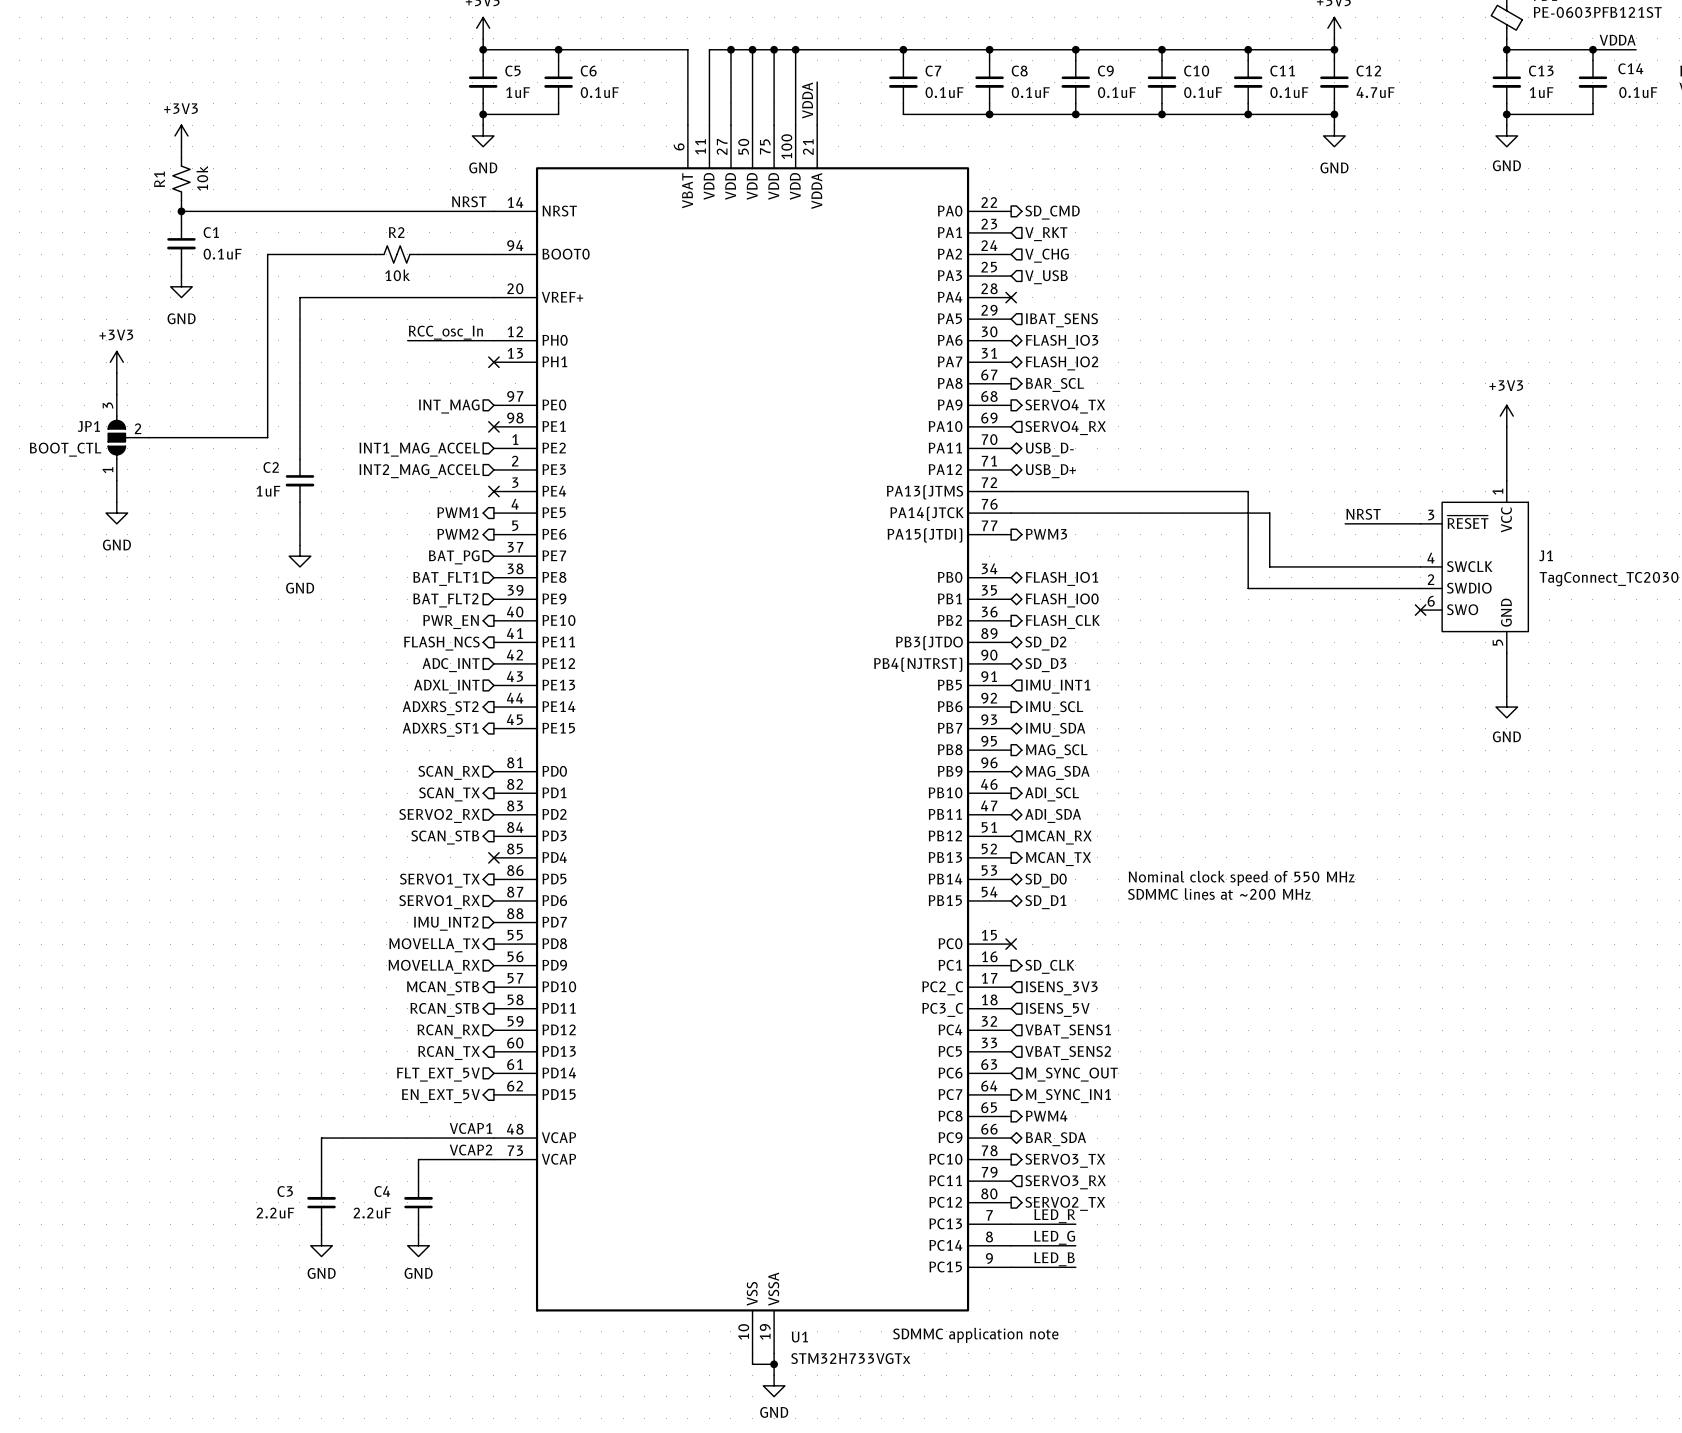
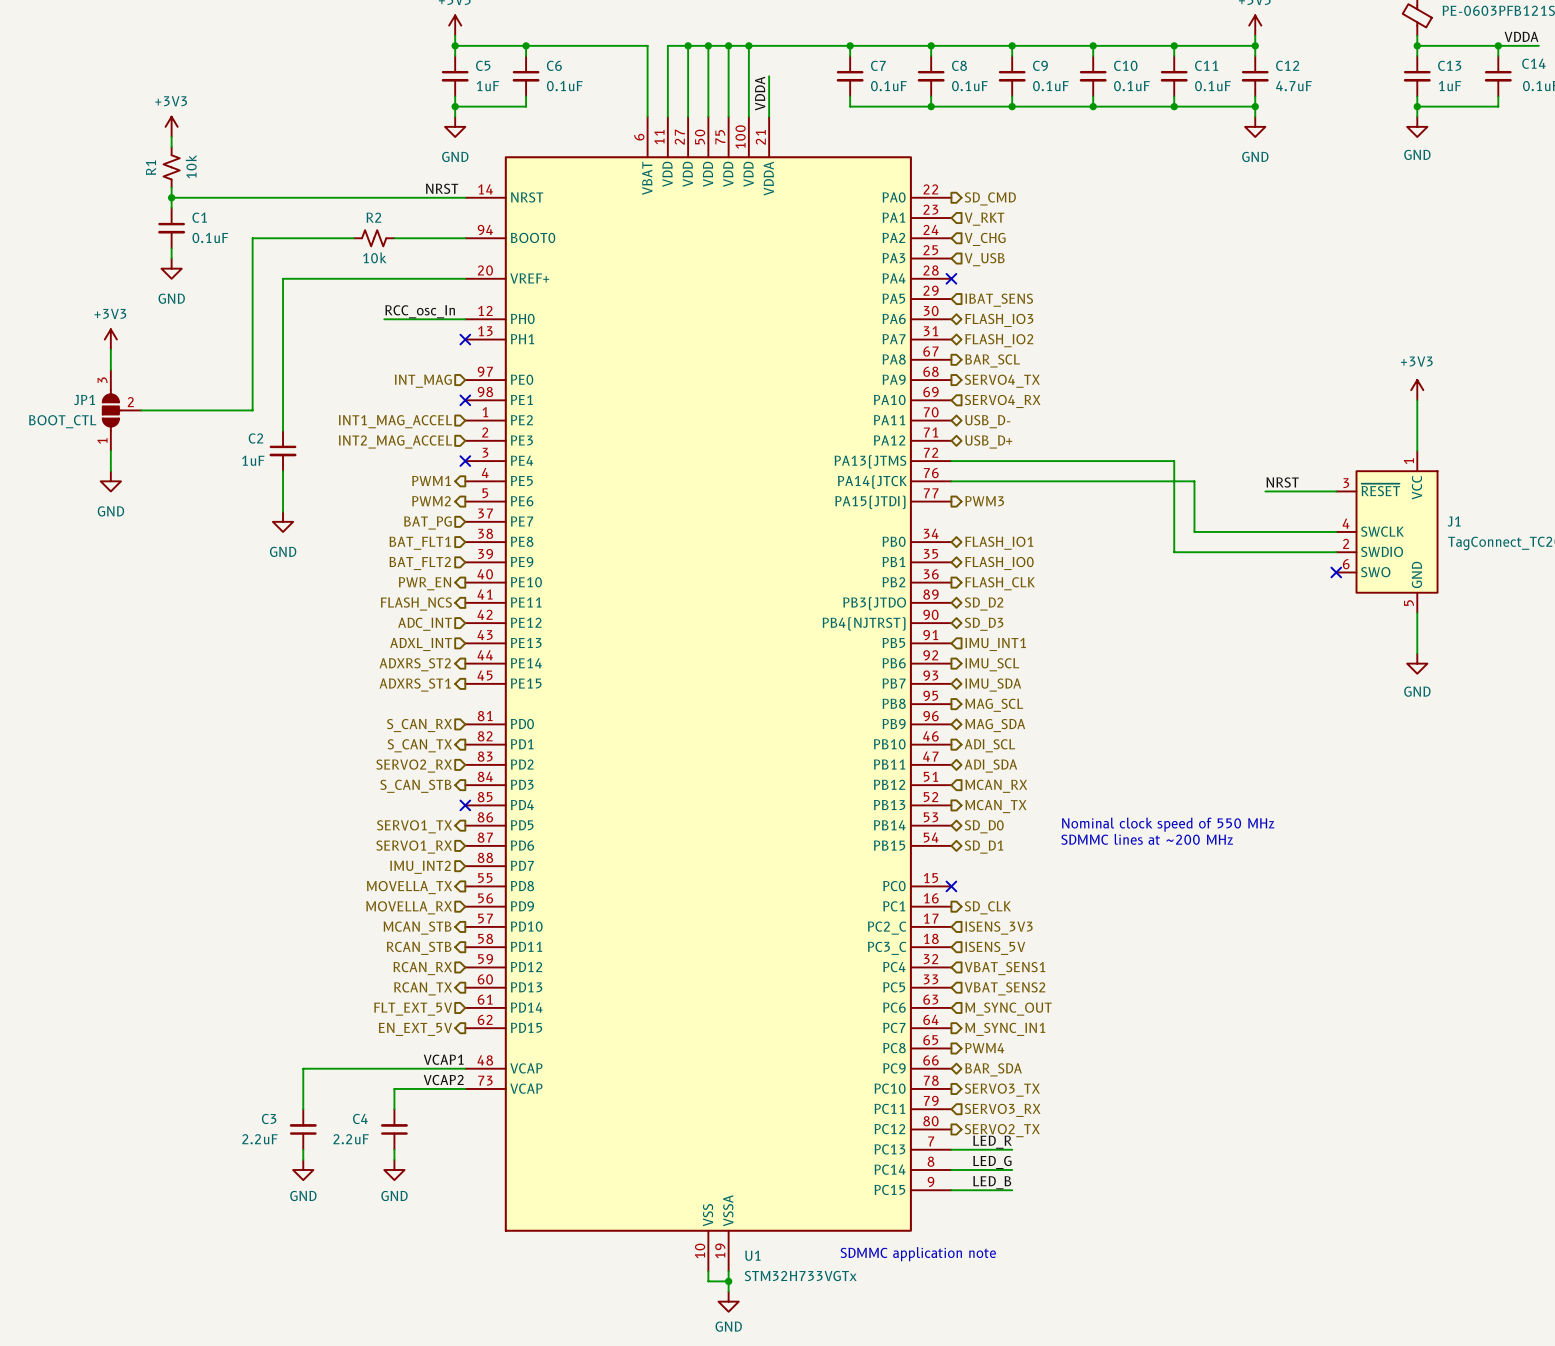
hierarchical label: SCAN_RX (449, 772) -> S_CAN_RX (419, 725)
hierarchical label: SCAN_TX (449, 794) -> S_CAN_TX (419, 745)
hierarchical label: SCAN_STB (445, 837) -> S_CAN_STB (415, 786)

